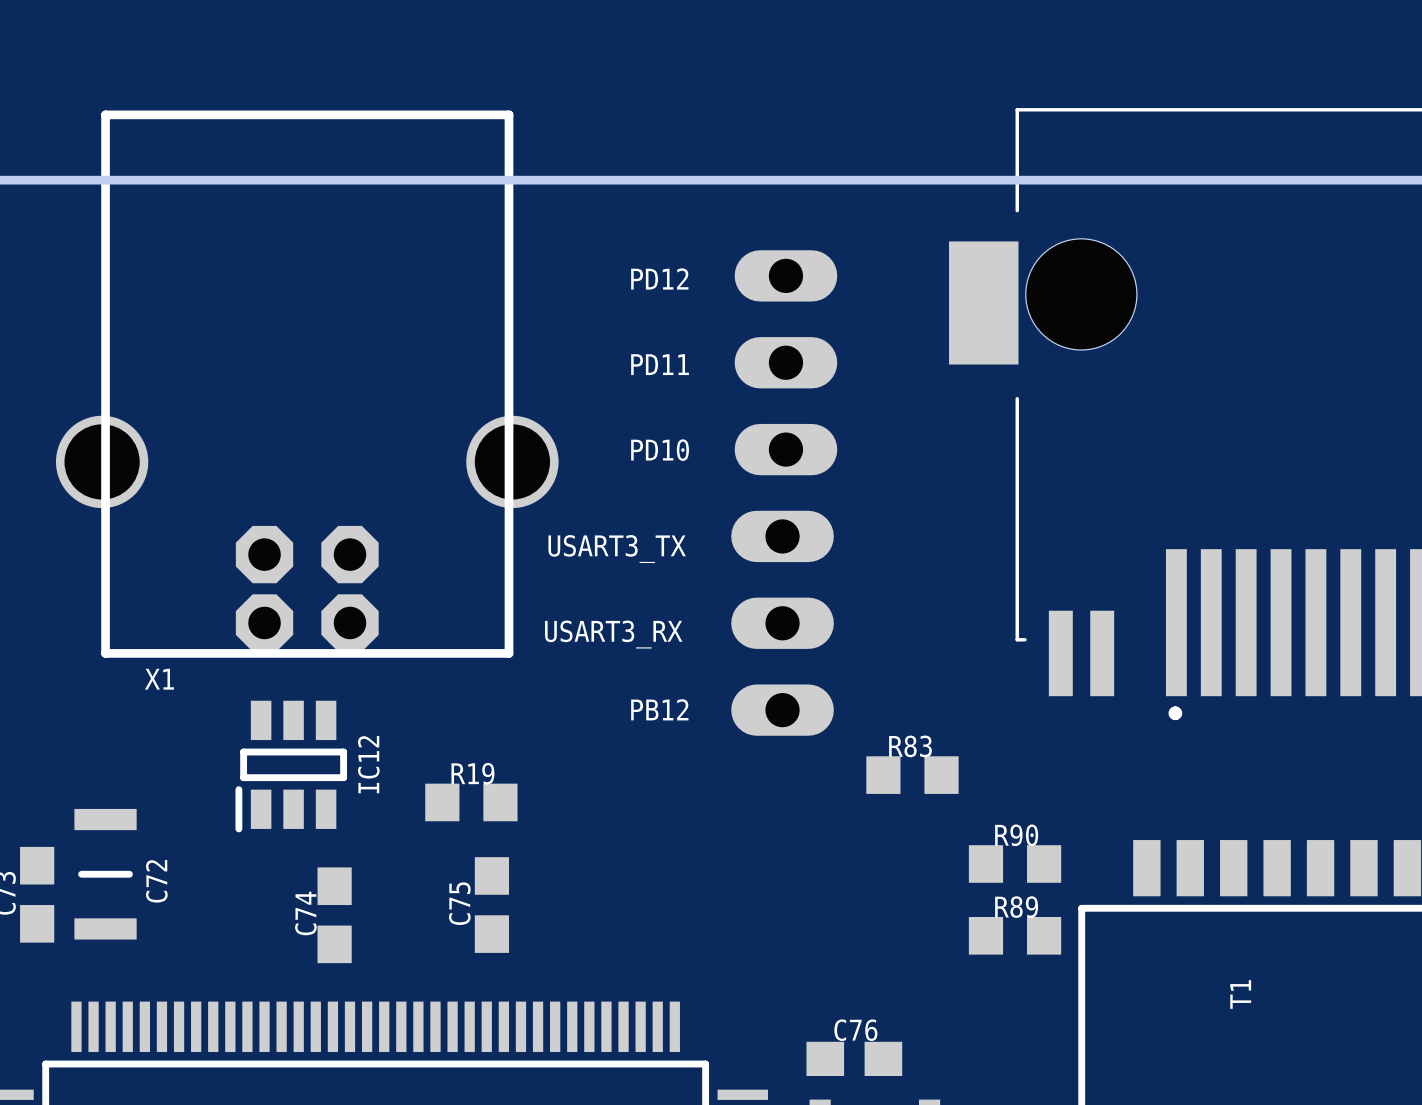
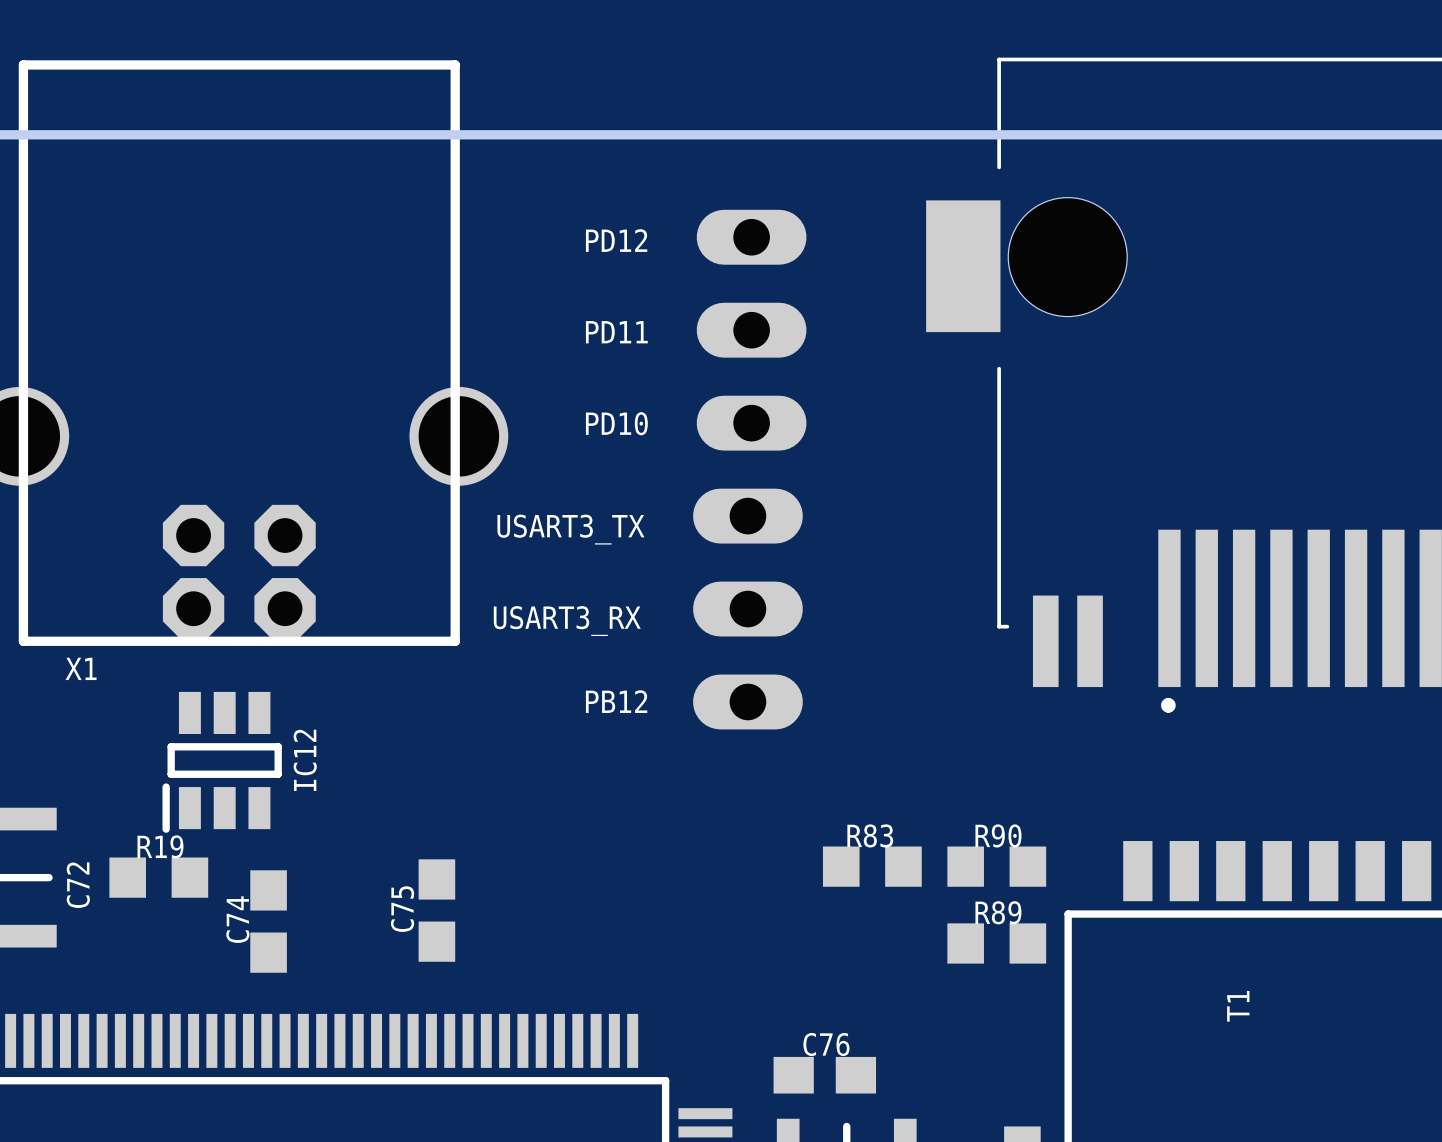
R83 position: (912, 775) -> (872, 866)
R19 position: (471, 802) -> (158, 877)

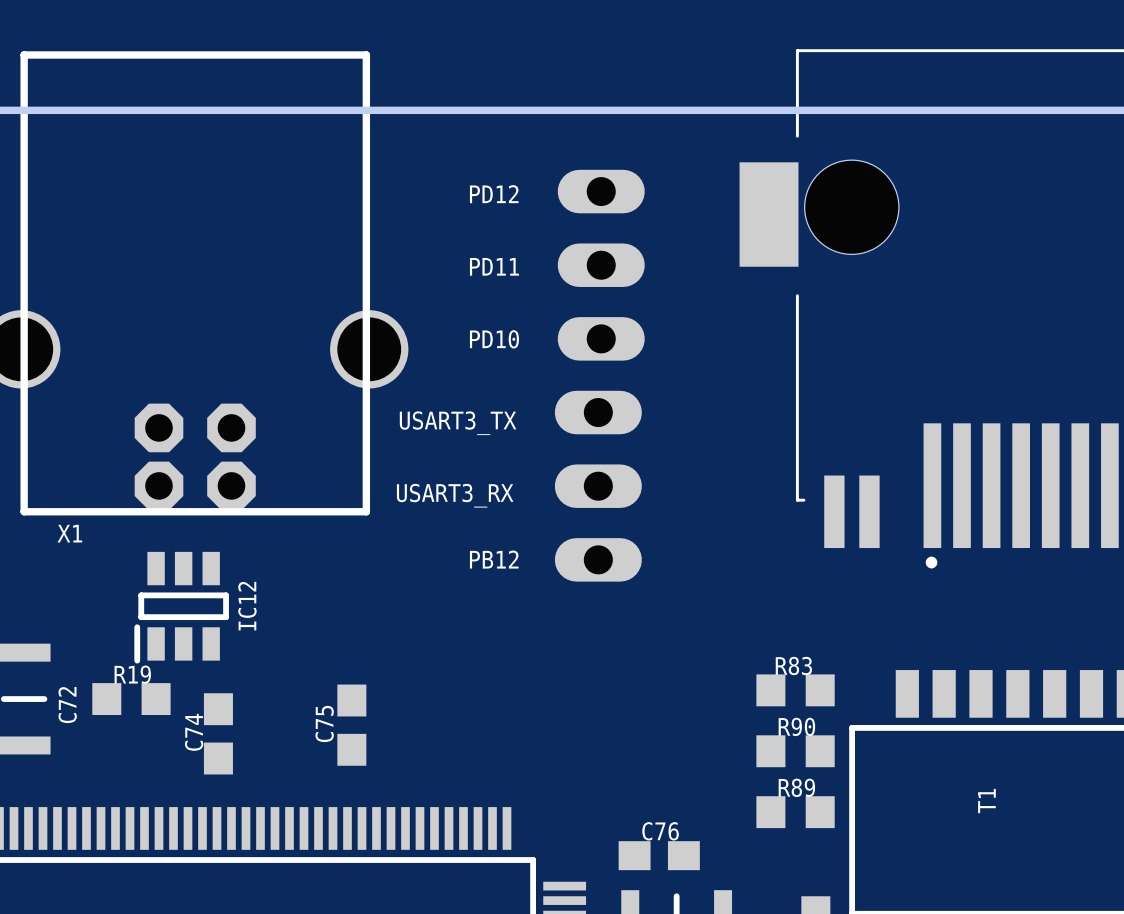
R90 name: R90 (998, 835) -> R83 (793, 666)
R83: (872, 866) -> none
R89 name: R89 (998, 912) -> R90 (796, 726)
R89: none -> (795, 812)

